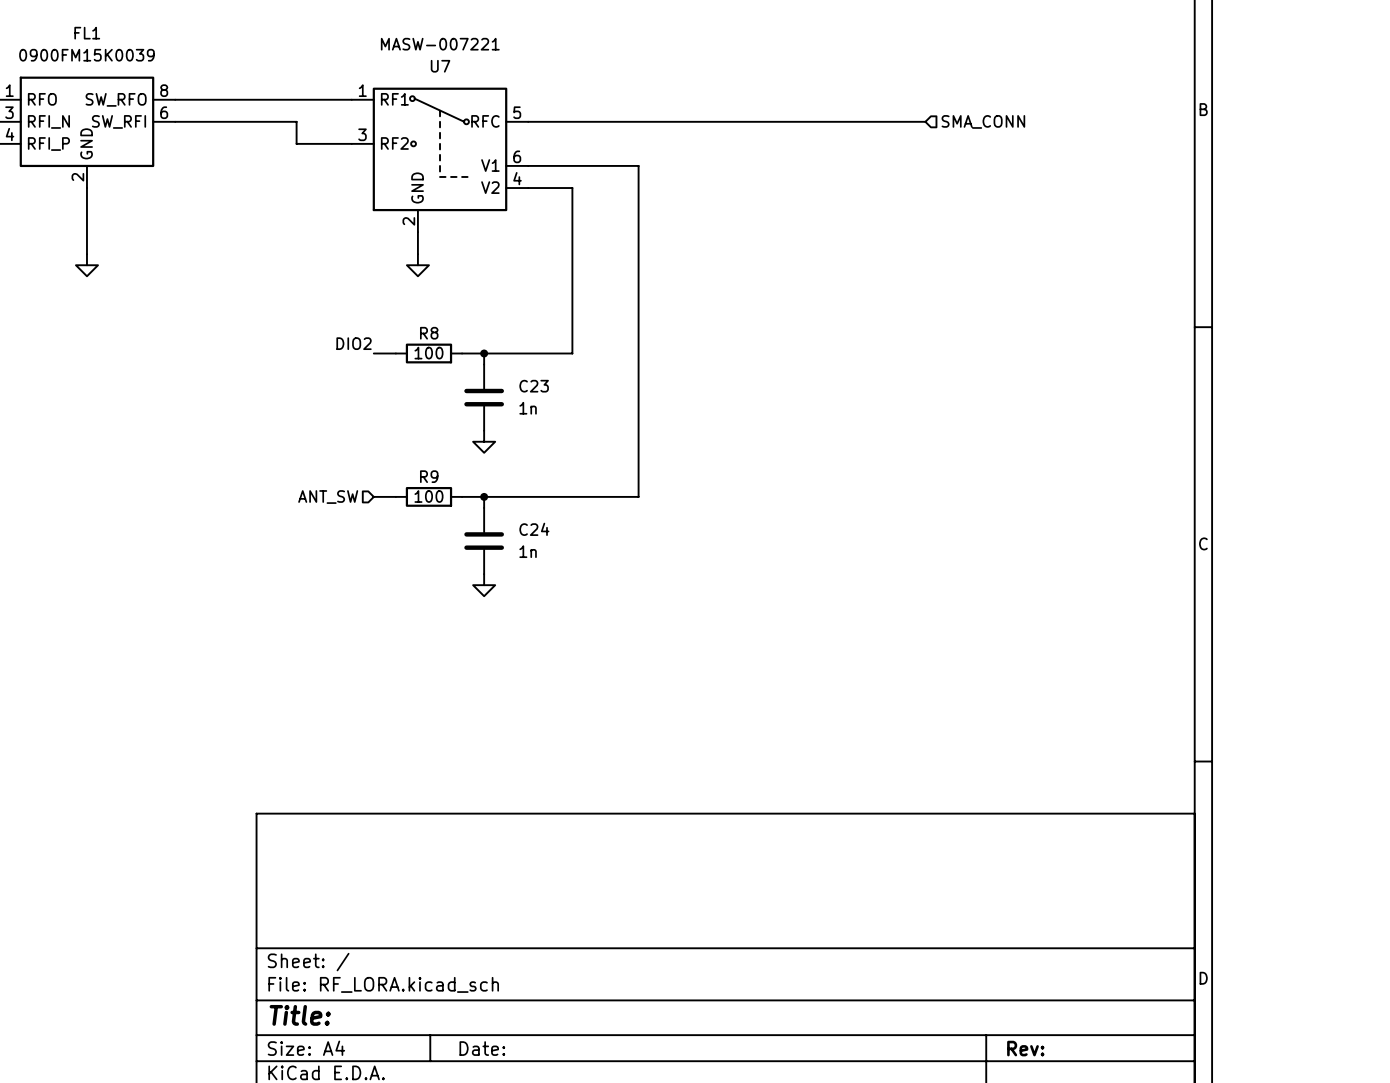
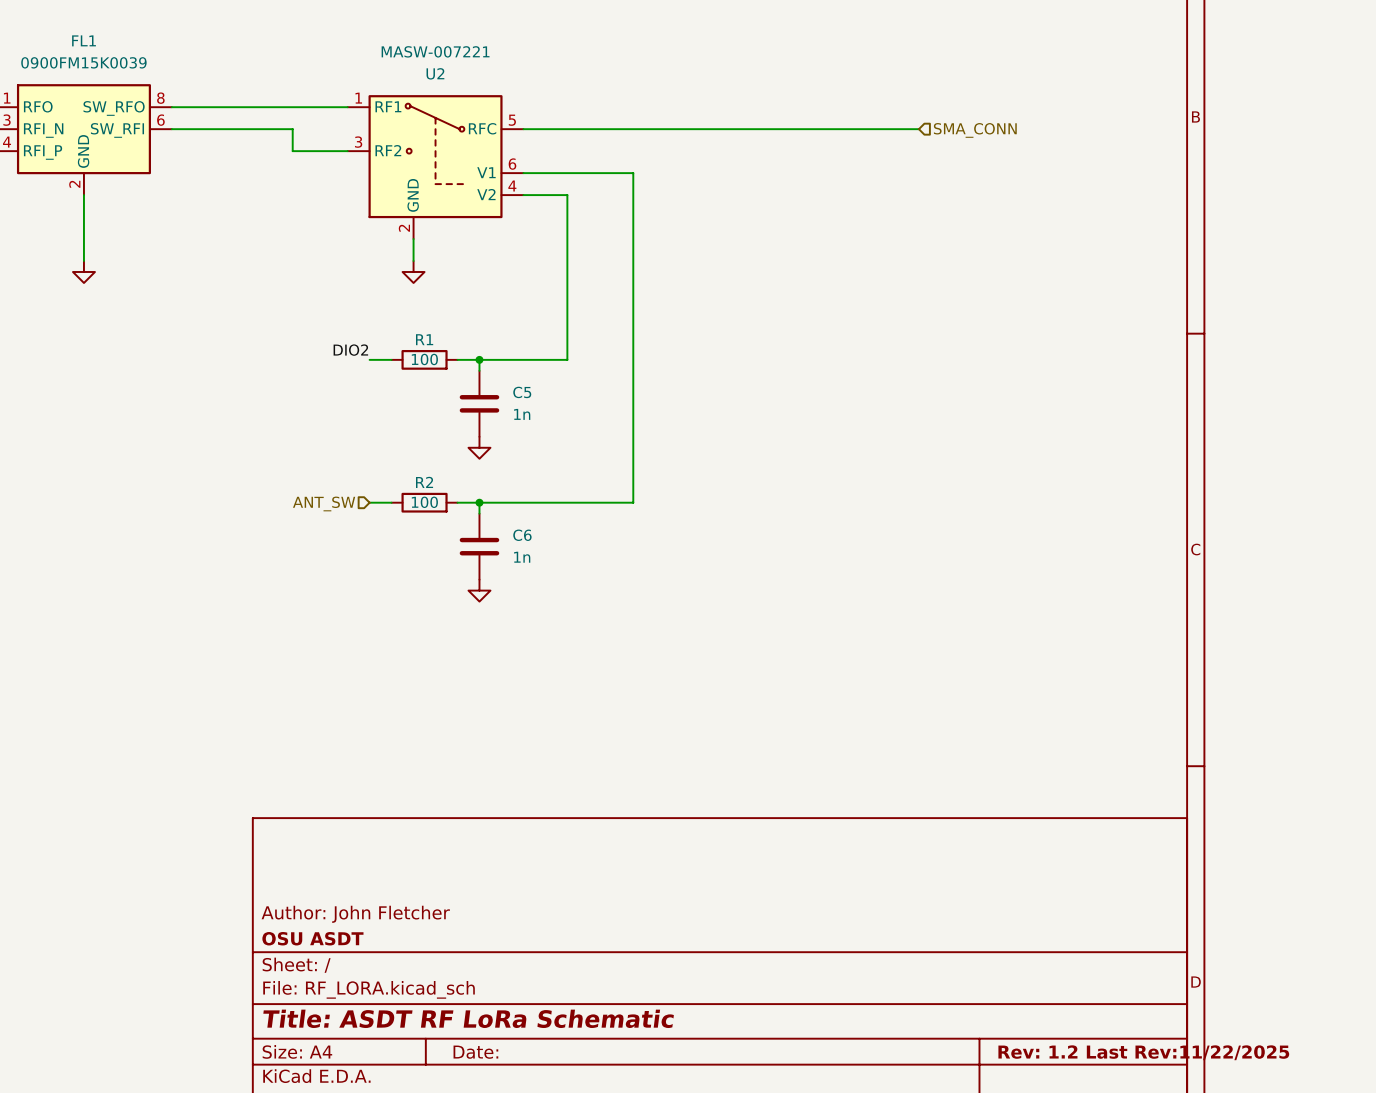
U7 name: U7 (440, 66) -> U2 (435, 73)
R8 name: R8 (429, 333) -> R1 (424, 339)
C23 name: C23 (534, 386) -> C5 (522, 392)
R9 name: R9 (429, 476) -> R2 (424, 482)
C24 name: C24 (534, 529) -> C6 (522, 535)
title block: none -> Author: John Fletcher (355, 914)
title block: none -> OSU ASDT (312, 938)
title block: Title: (300, 1015) -> Title: ASDT RF LoRa Schematic (468, 1018)
title block: Rev: (1025, 1048) -> Rev: 1.2 Last Rev:11/22/2025 (1143, 1052)

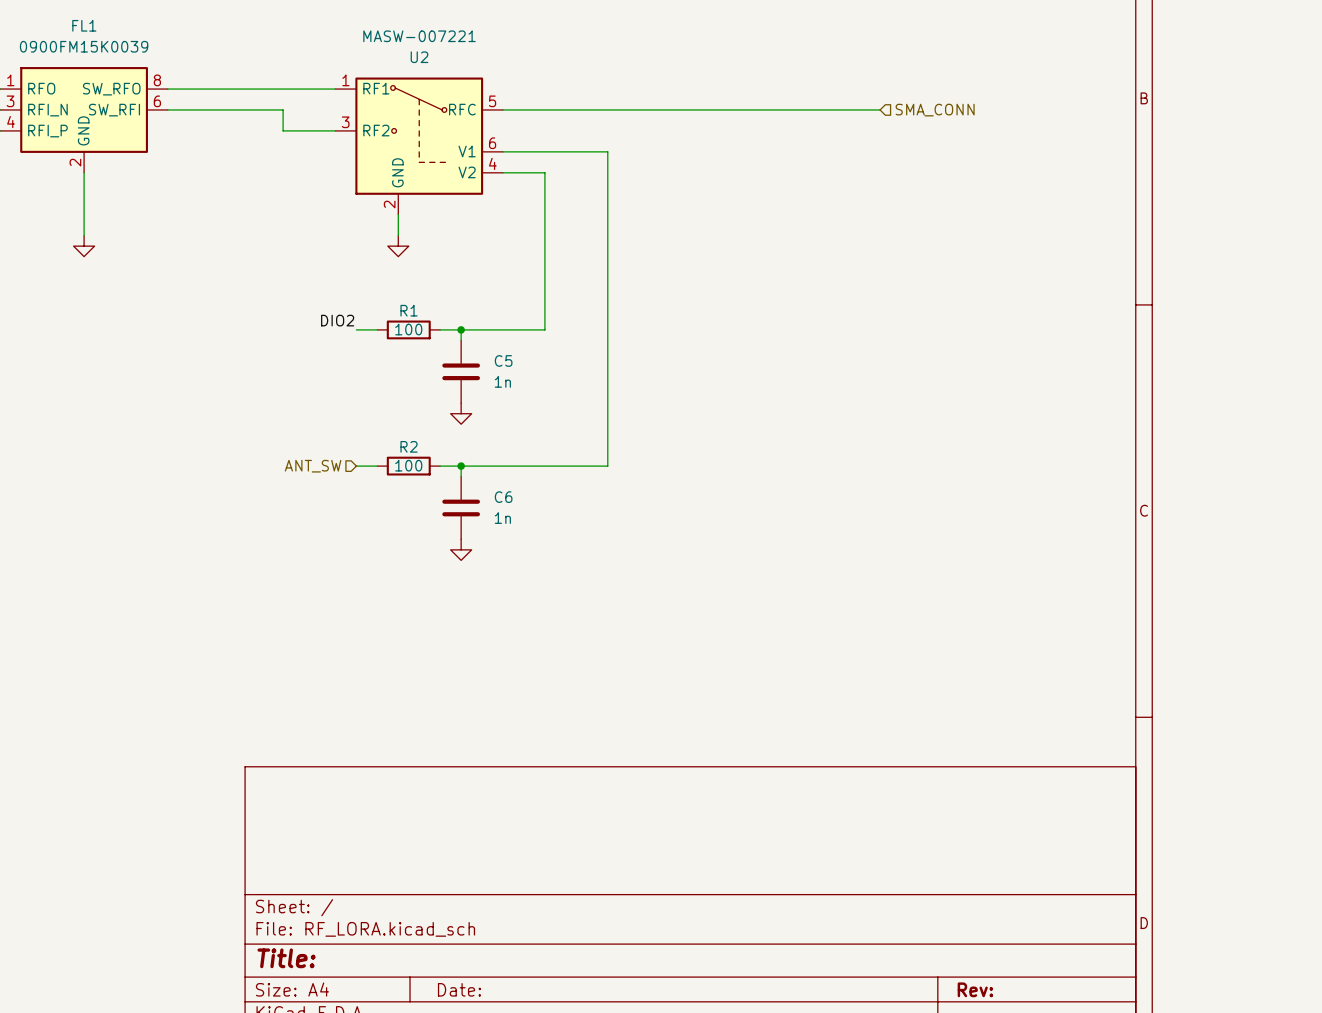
title block: Author: John Fletcher (355, 914) -> none
title block: OSU ASDT (312, 938) -> none
title block: Title: ASDT RF LoRa Schematic (468, 1018) -> Title: (286, 958)
title block: Rev: 1.2 Last Rev:11/22/2025 (1143, 1052) -> Rev: (975, 989)

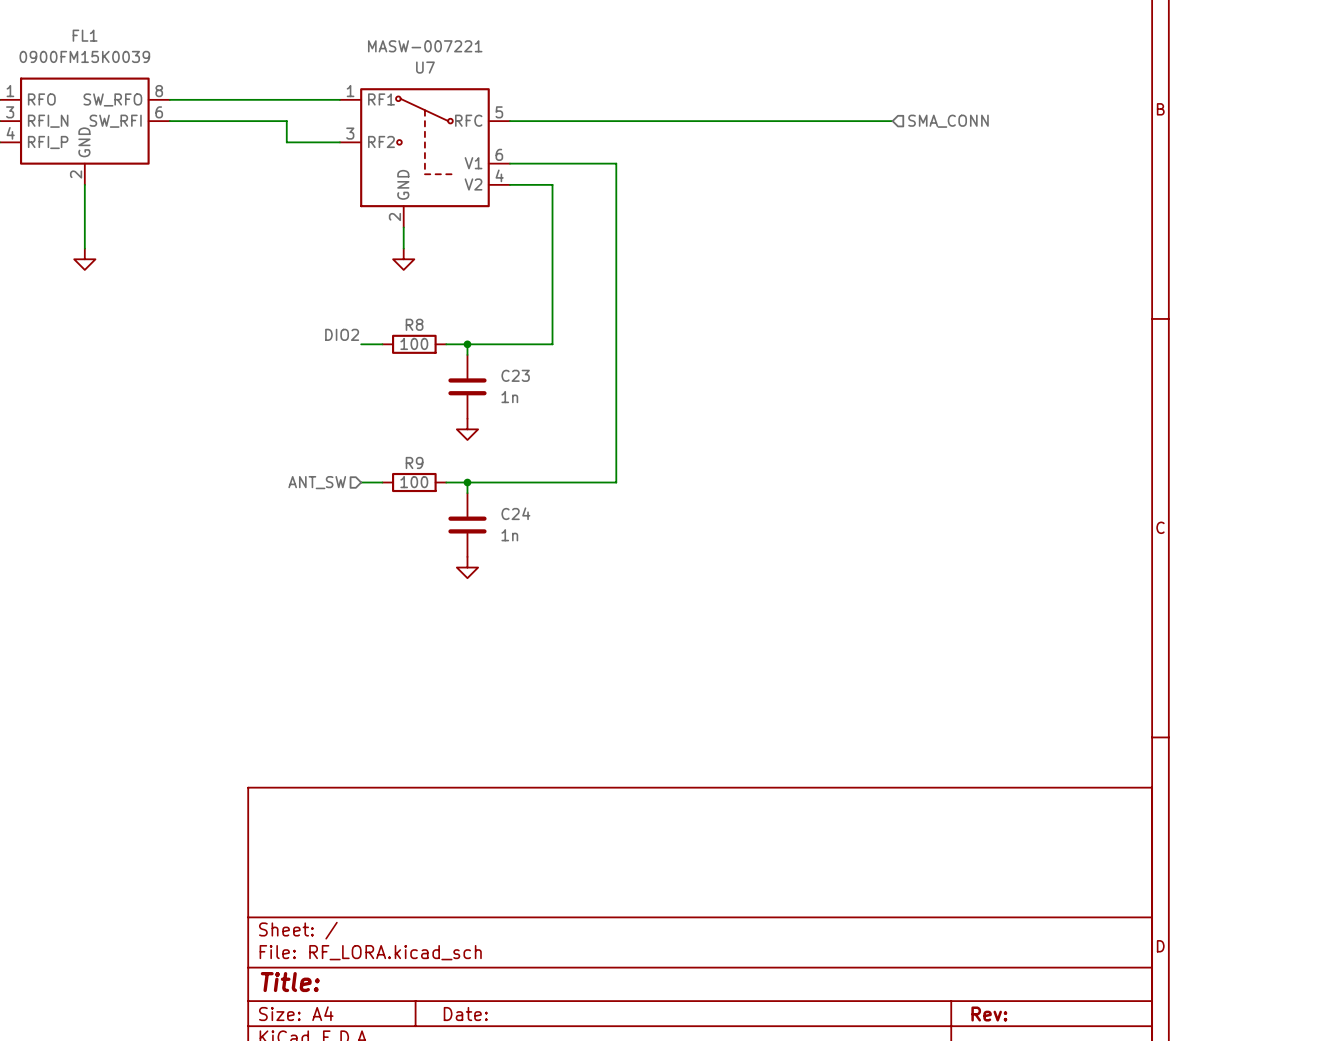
U2 name: U2 (419, 57) -> U7 (425, 67)
R1 name: R1 (409, 310) -> R8 (414, 324)
C5 name: C5 (503, 360) -> C23 (515, 375)
R2 name: R2 (409, 446) -> R9 (414, 462)
C6 name: C6 (503, 497) -> C24 (515, 513)

